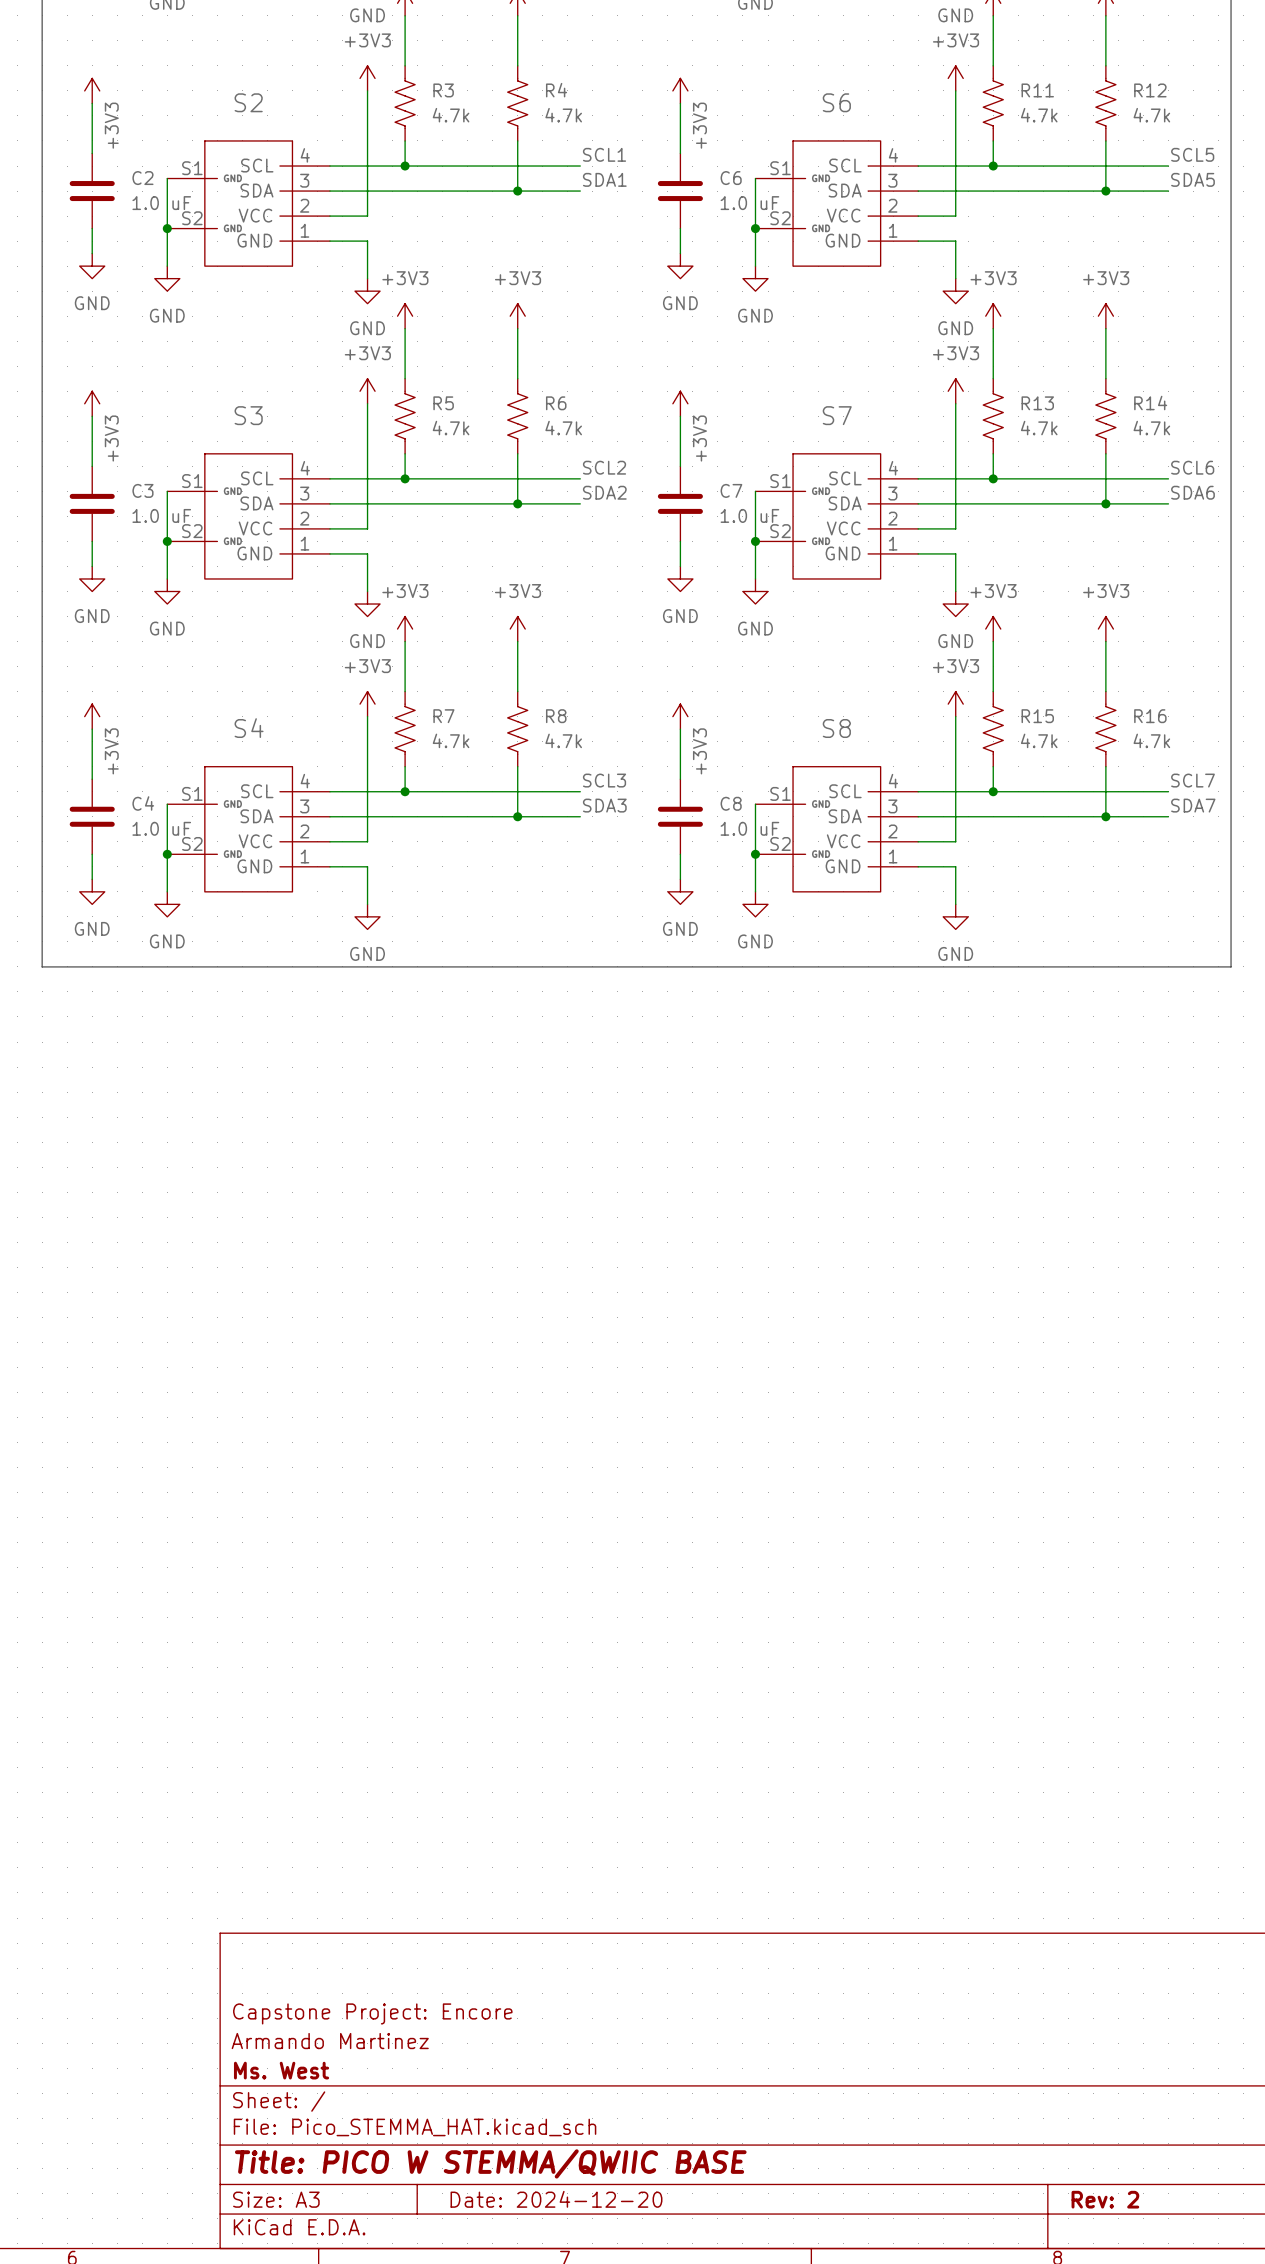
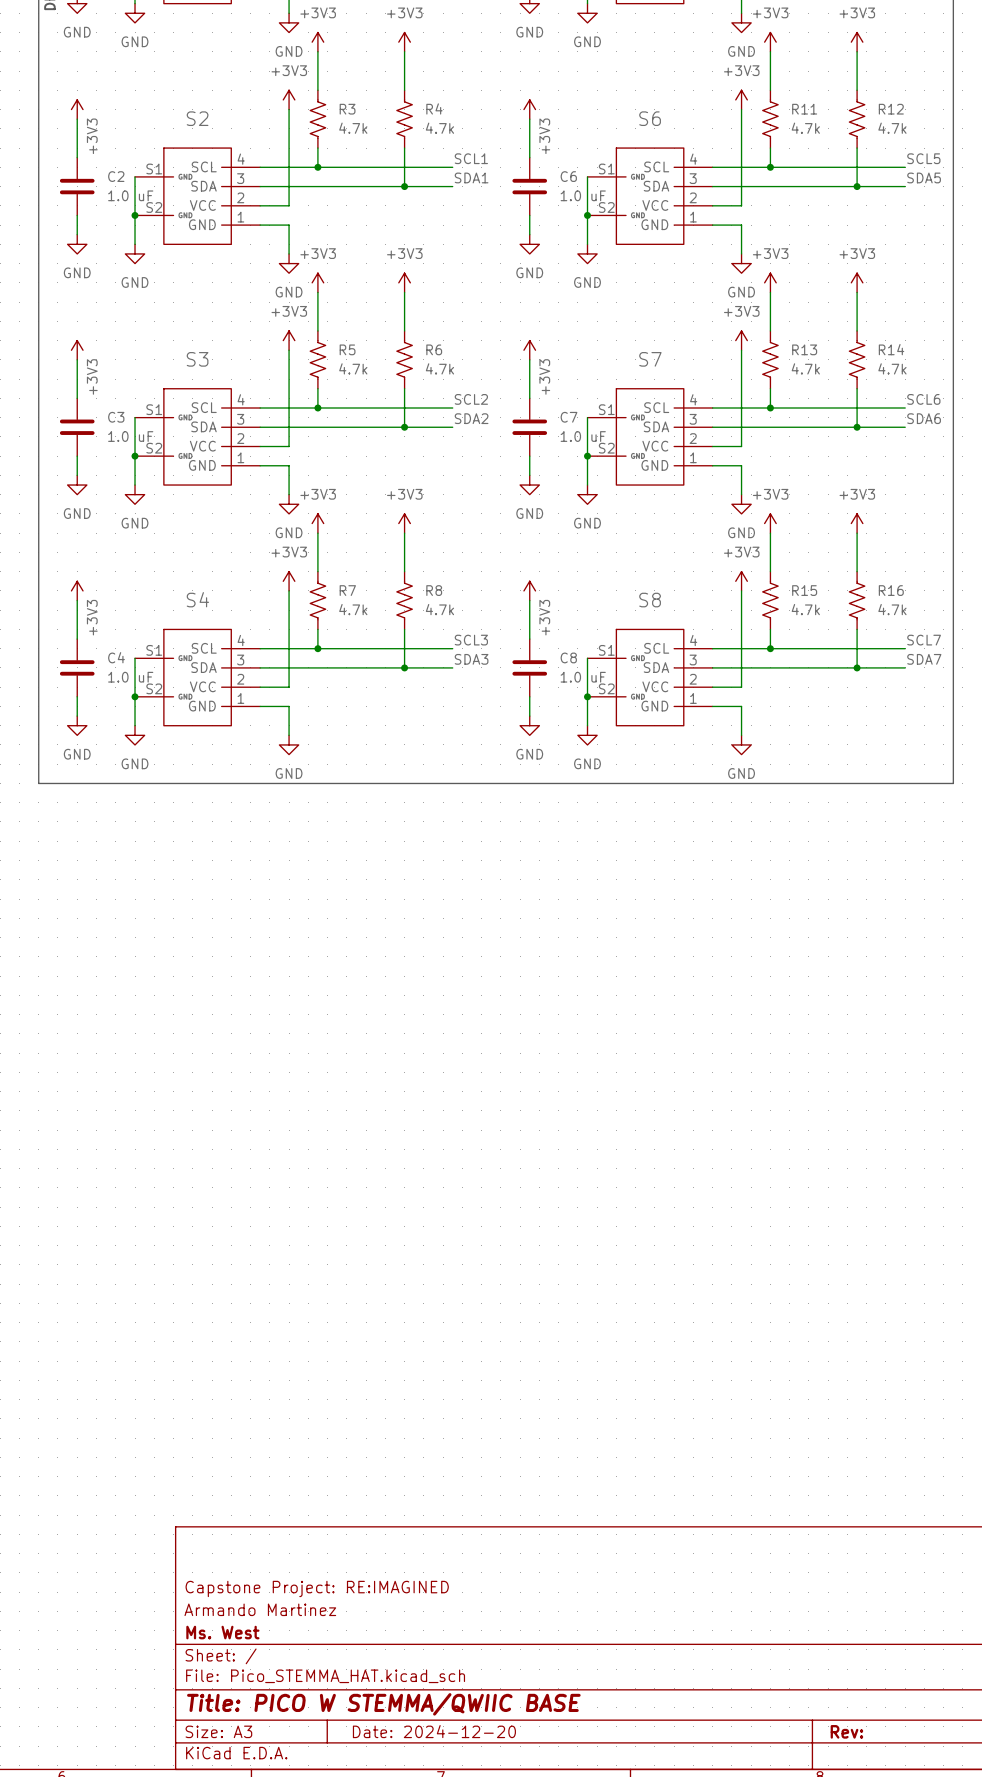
title block: Capstone Project: Encore (372, 2013) -> Capstone Project: RE:IMAGINED (317, 1588)
title block: Rev: 2 (1105, 2199) -> Rev: (846, 1731)

